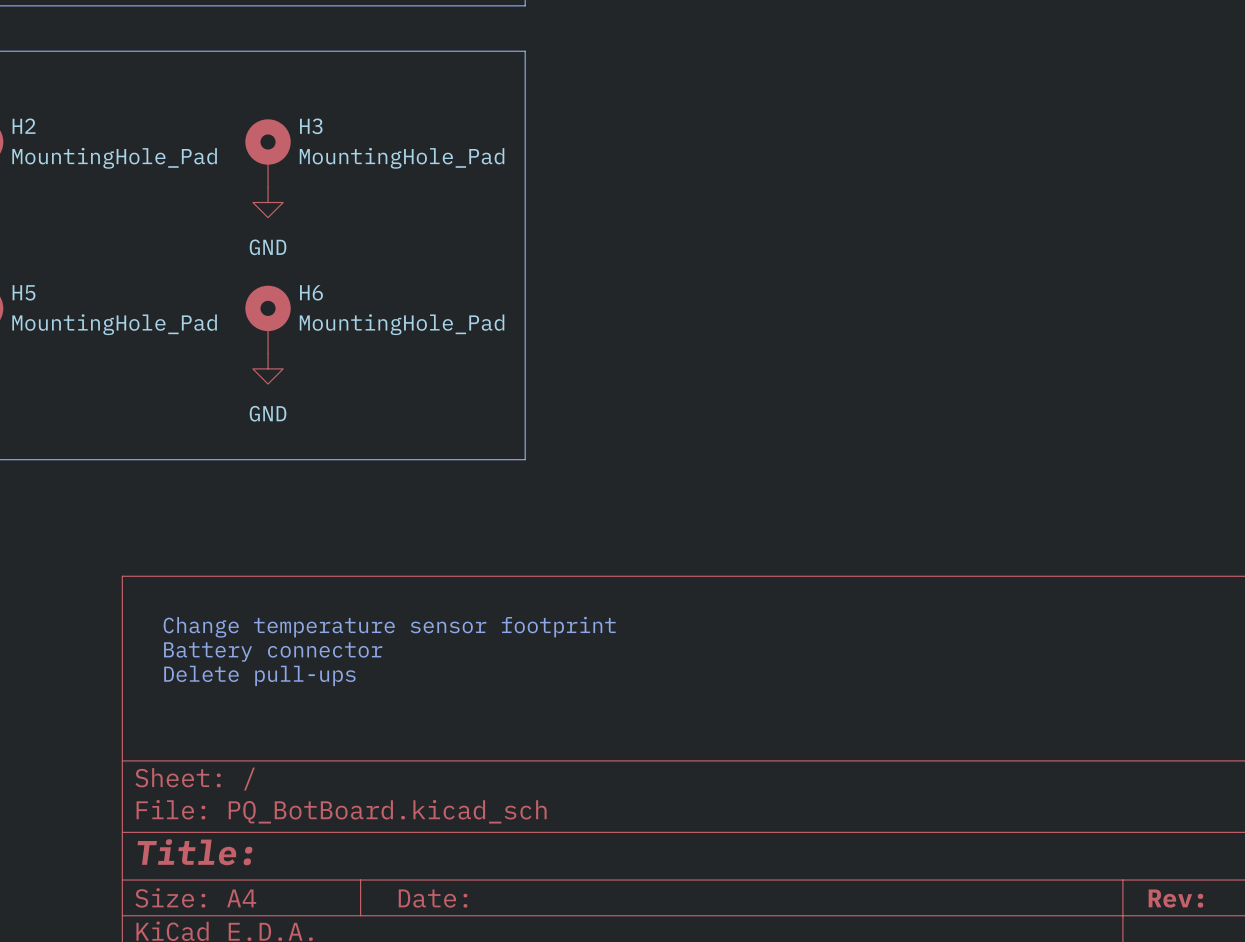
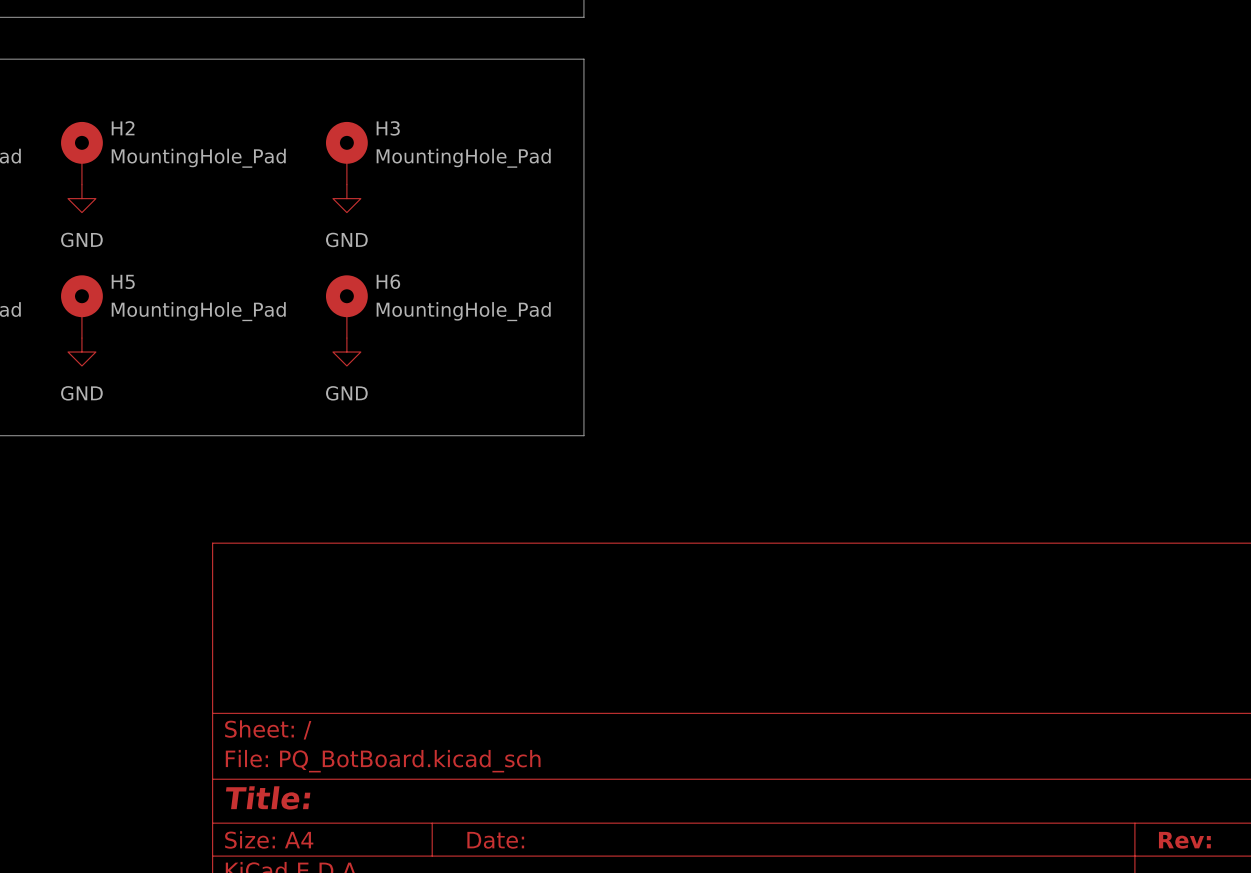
text: Change temperature sensor footprint (389, 627) -> none
text: Battery connector (273, 652) -> none
text: Delete pull-ups (259, 675) -> none

